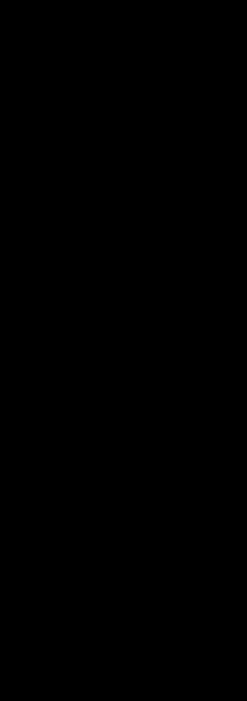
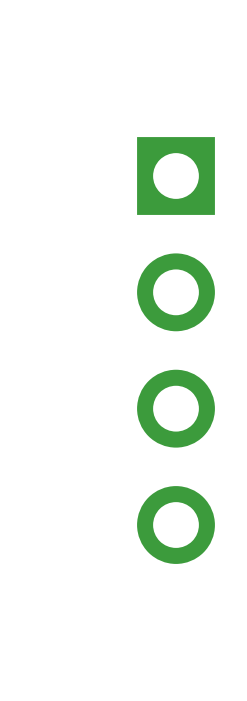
part: none -> (176, 350)

